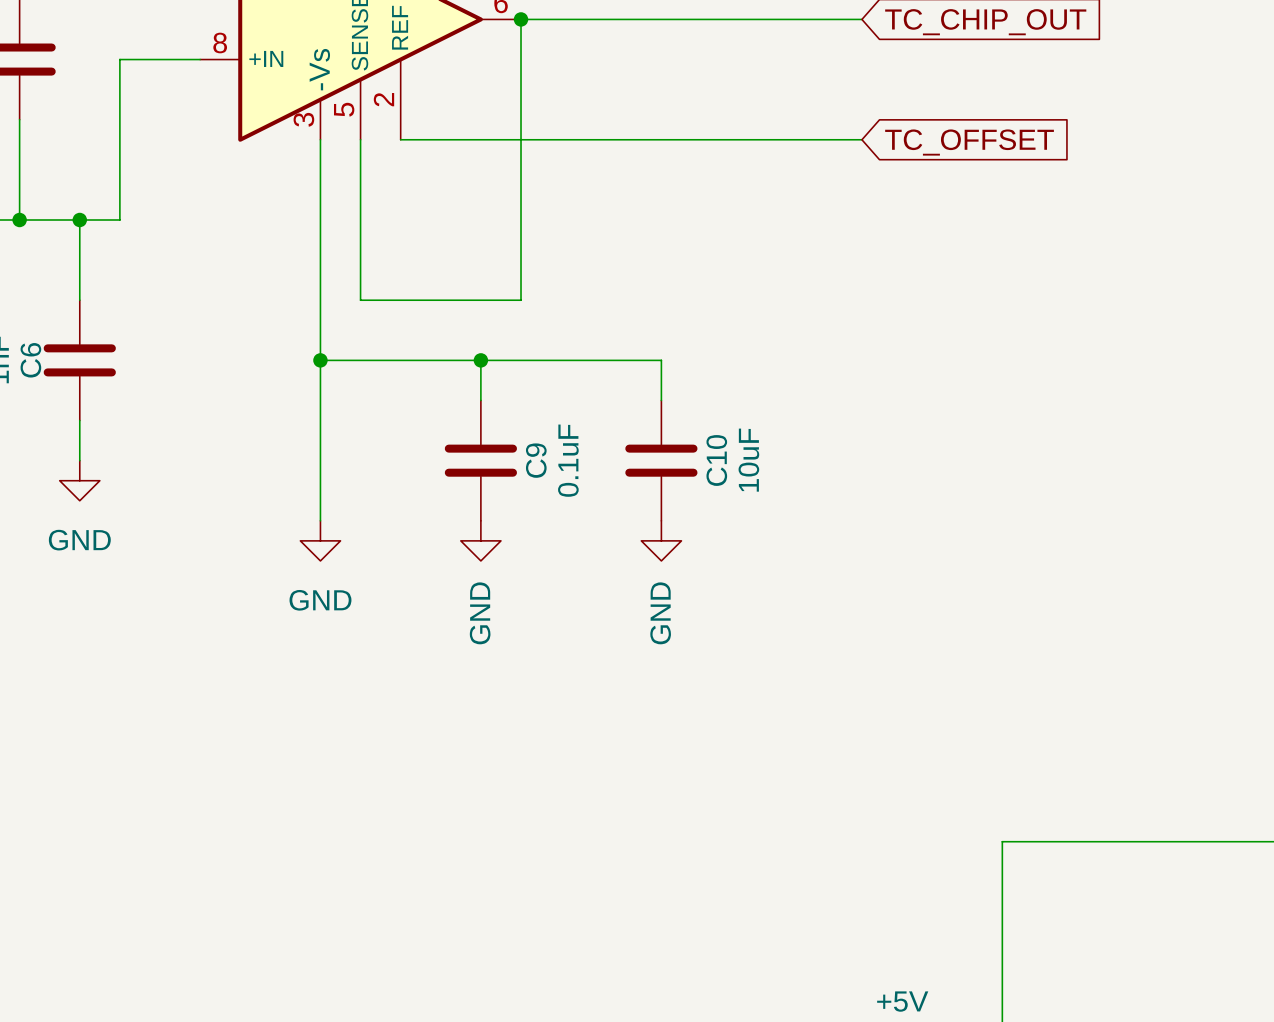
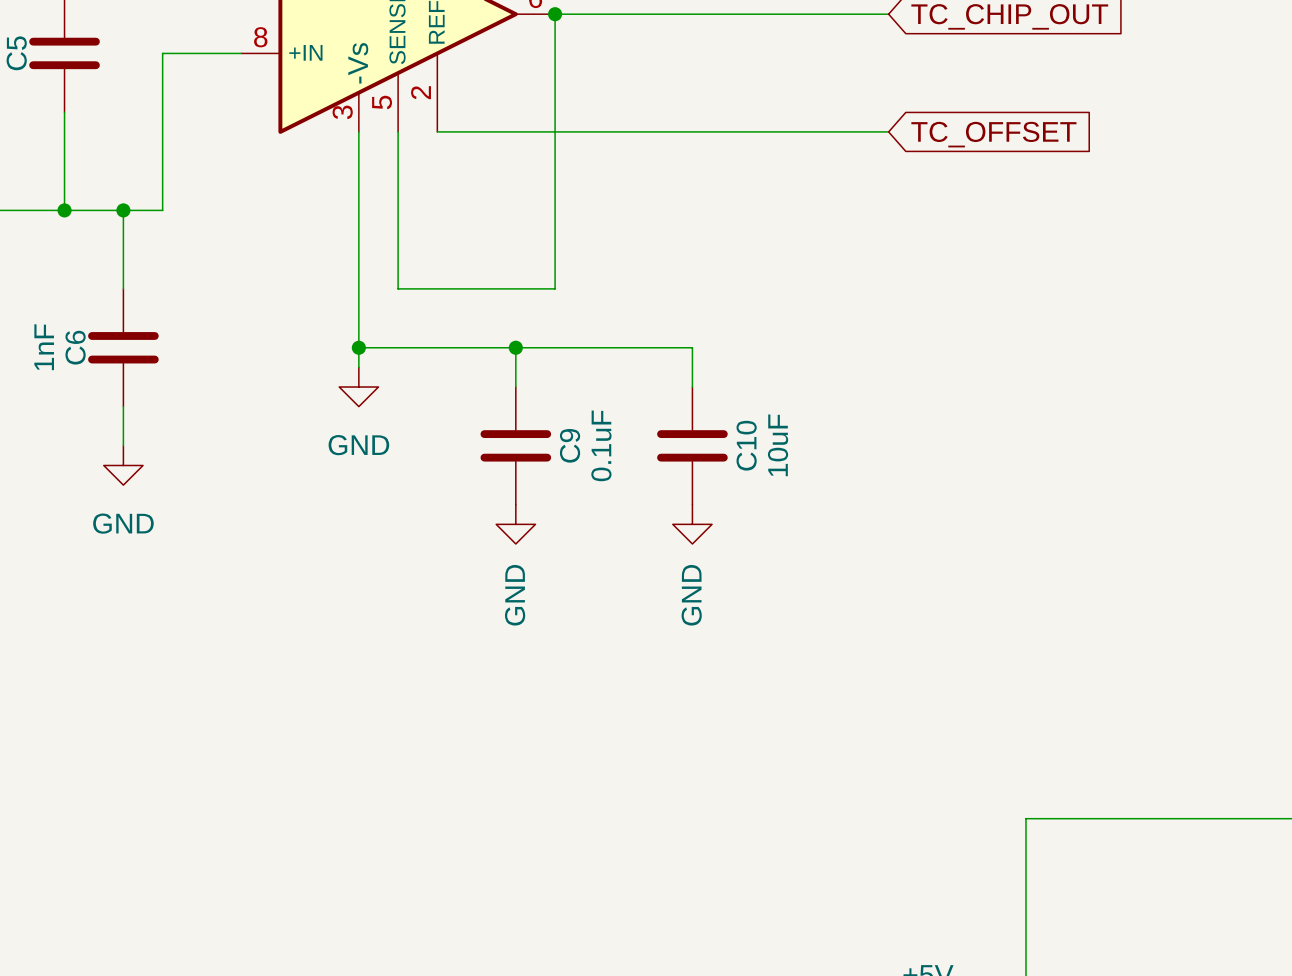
wire: (320, 380) (320, 520) -> none
power symbol position: GND (320, 540) -> GND (358, 387)

